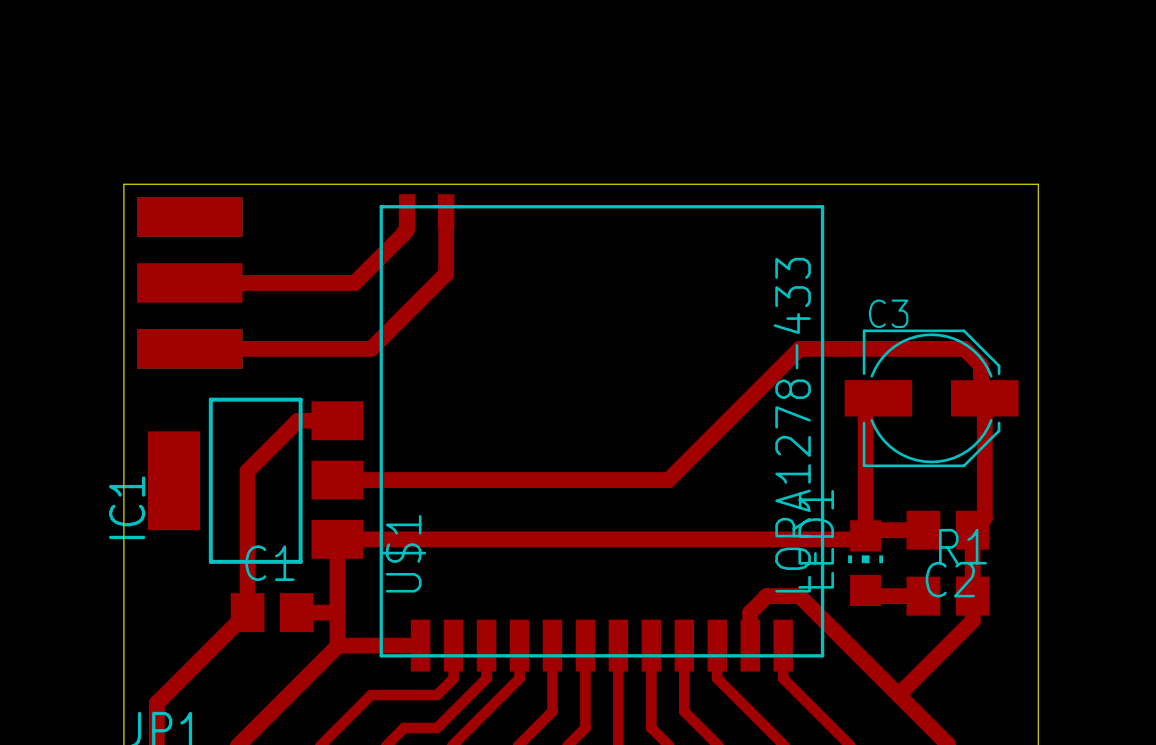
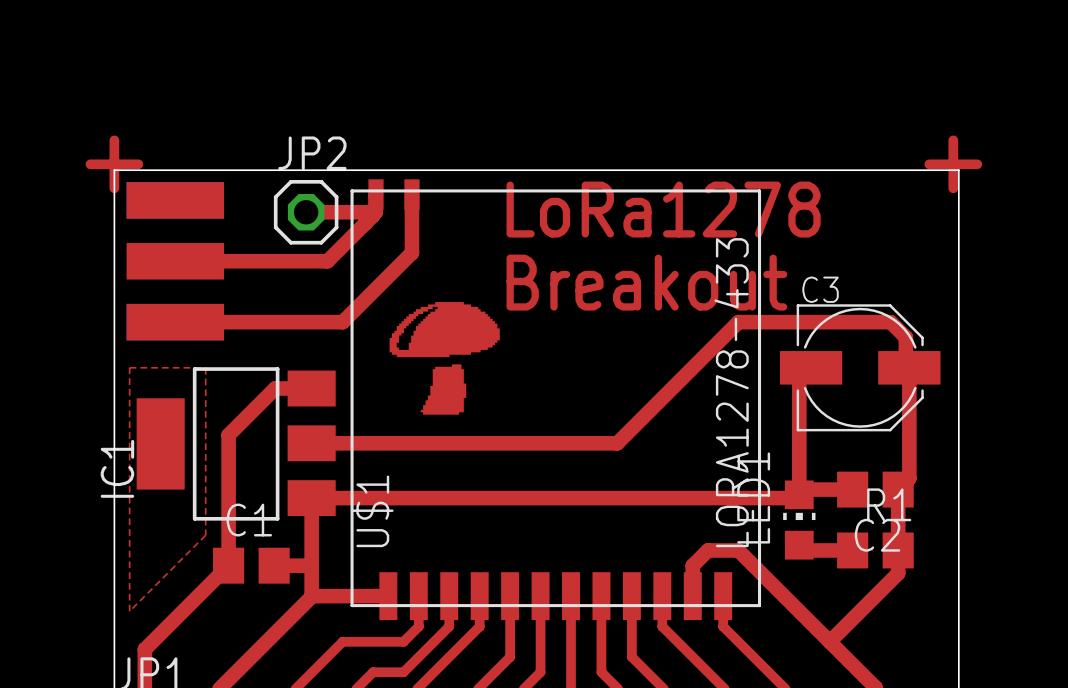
top track: none -> (114, 140) (114, 188)
top track: none -> (953, 140) (953, 188)
top track: none -> (90, 164) (138, 164)
top track: none -> (929, 164) (977, 164)
text: none -> LoRa1278 (663, 209)
top track: none -> (306, 212) (365, 212) (365, 223)
JP2: none -> (306, 212)
text: none -> Breakout (646, 282)
drawing: none -> [389, 302, 500, 415]
top zone outline: none -> (129, 367) (129, 611) (205, 535) (205, 367) (129, 367)

